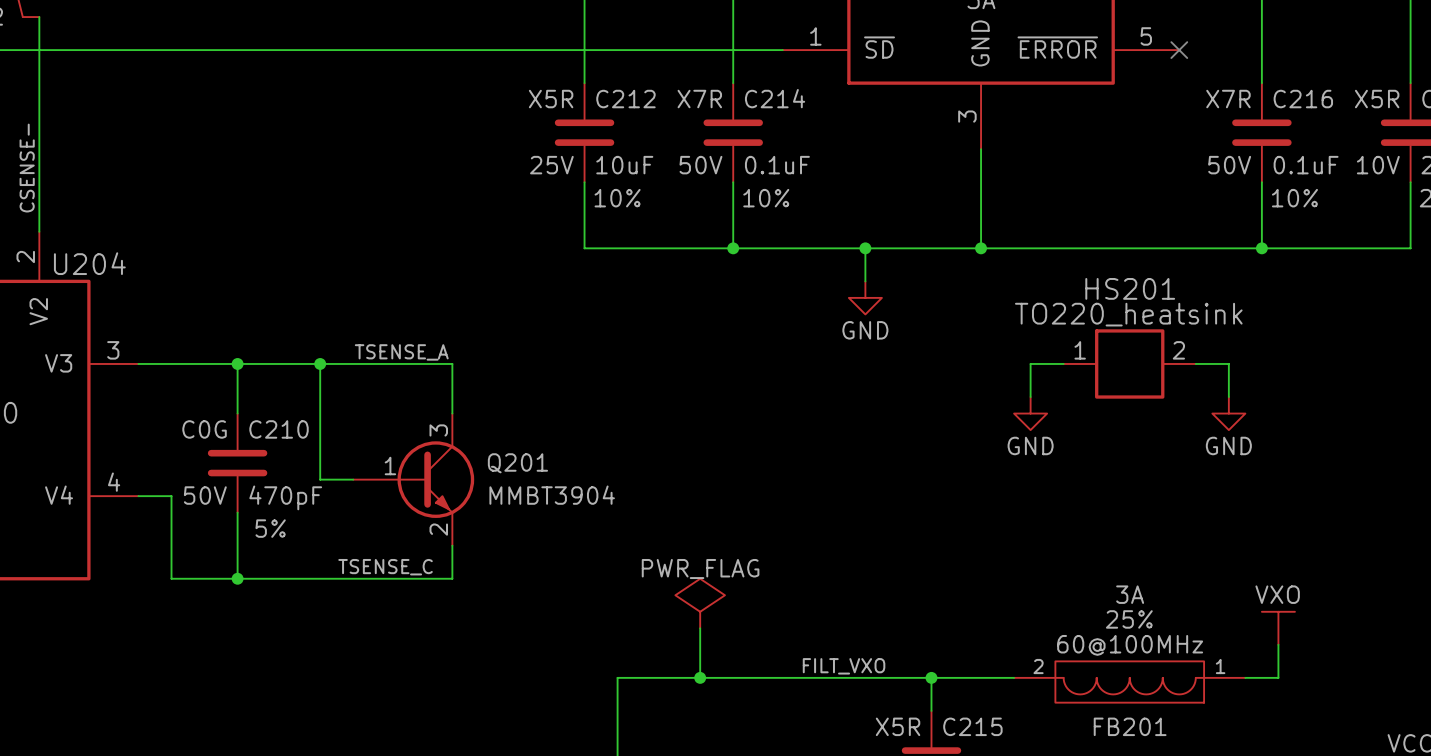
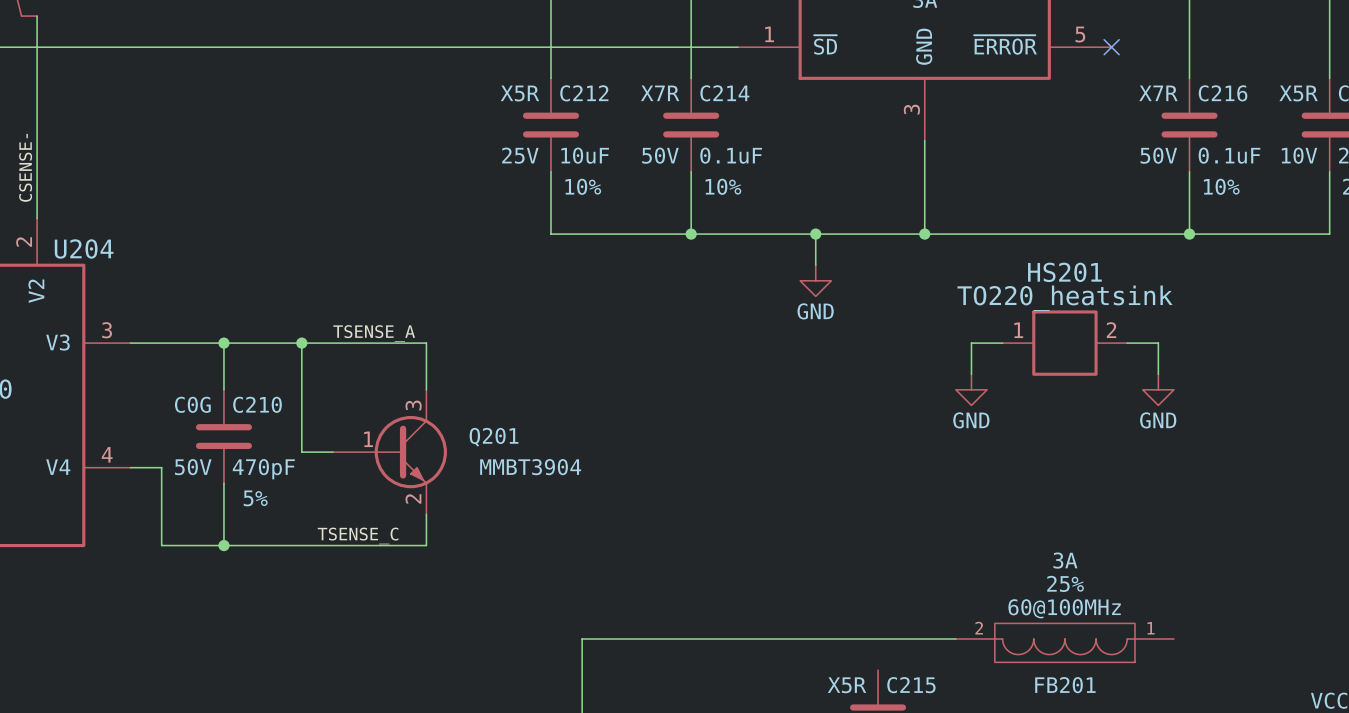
power symbol: PWR_FLAG (700, 603) -> none
wire: (700, 628) (700, 677) -> none
power symbol: VXO (1278, 628) -> none
wire: (1278, 644) (1278, 677) (1245, 677) -> none
label: FILT_VXO (844, 666) -> none
junction: (700, 677) -> none
wire: (931, 677) (931, 710) -> none
junction: (931, 677) -> none

